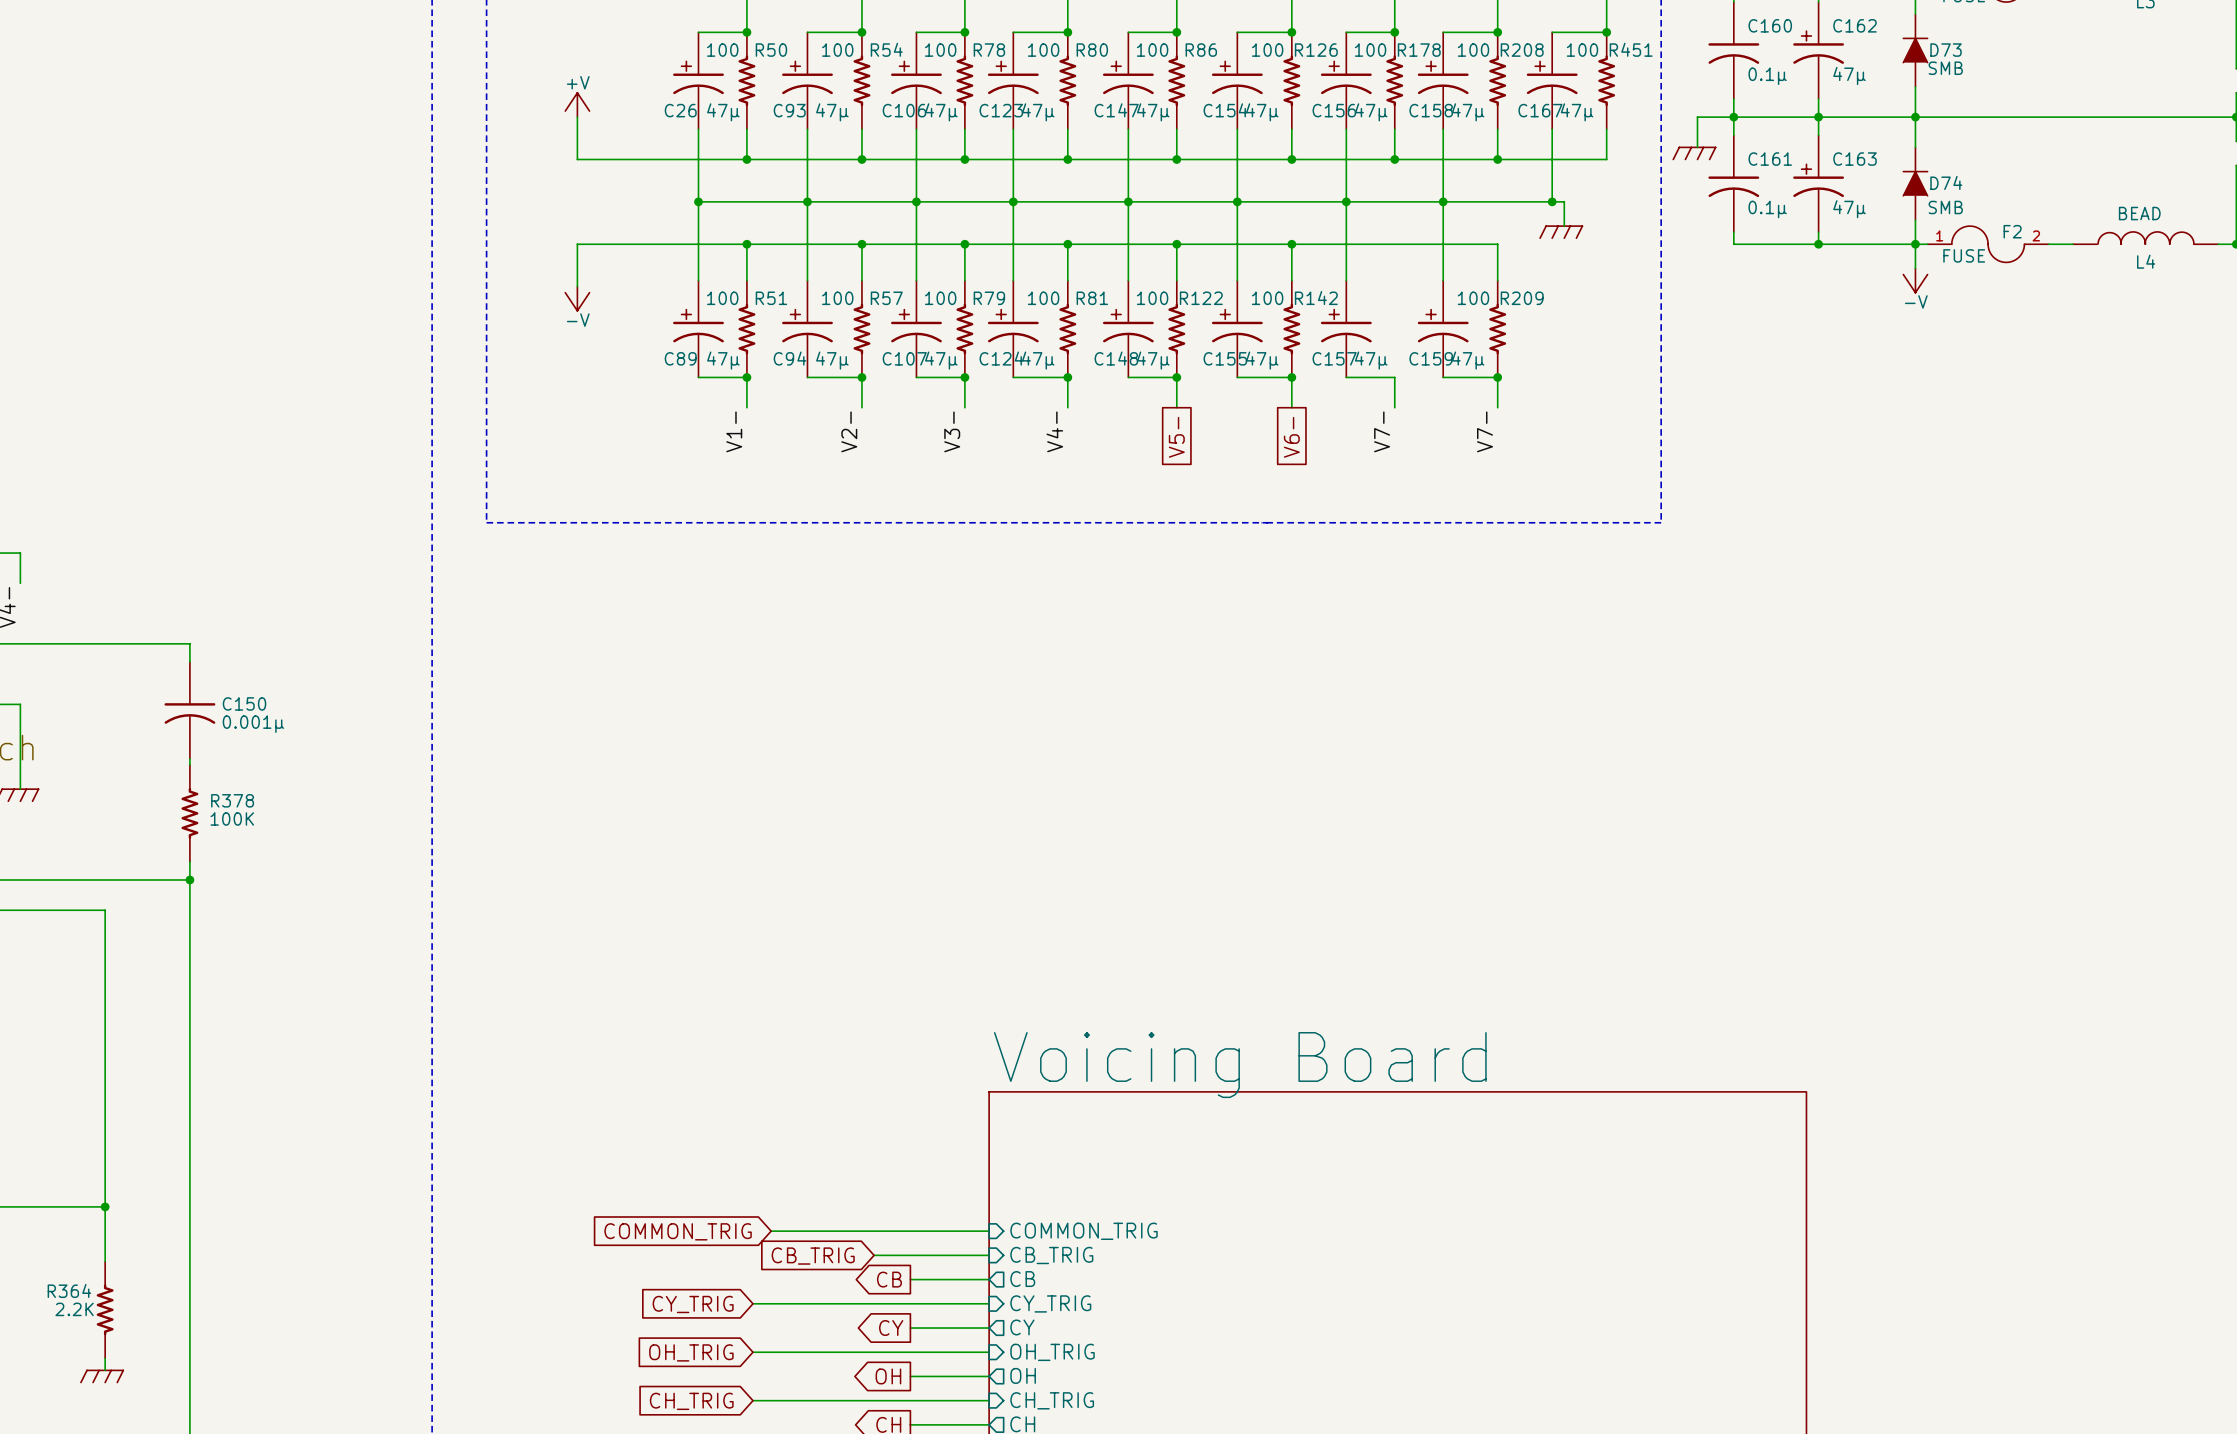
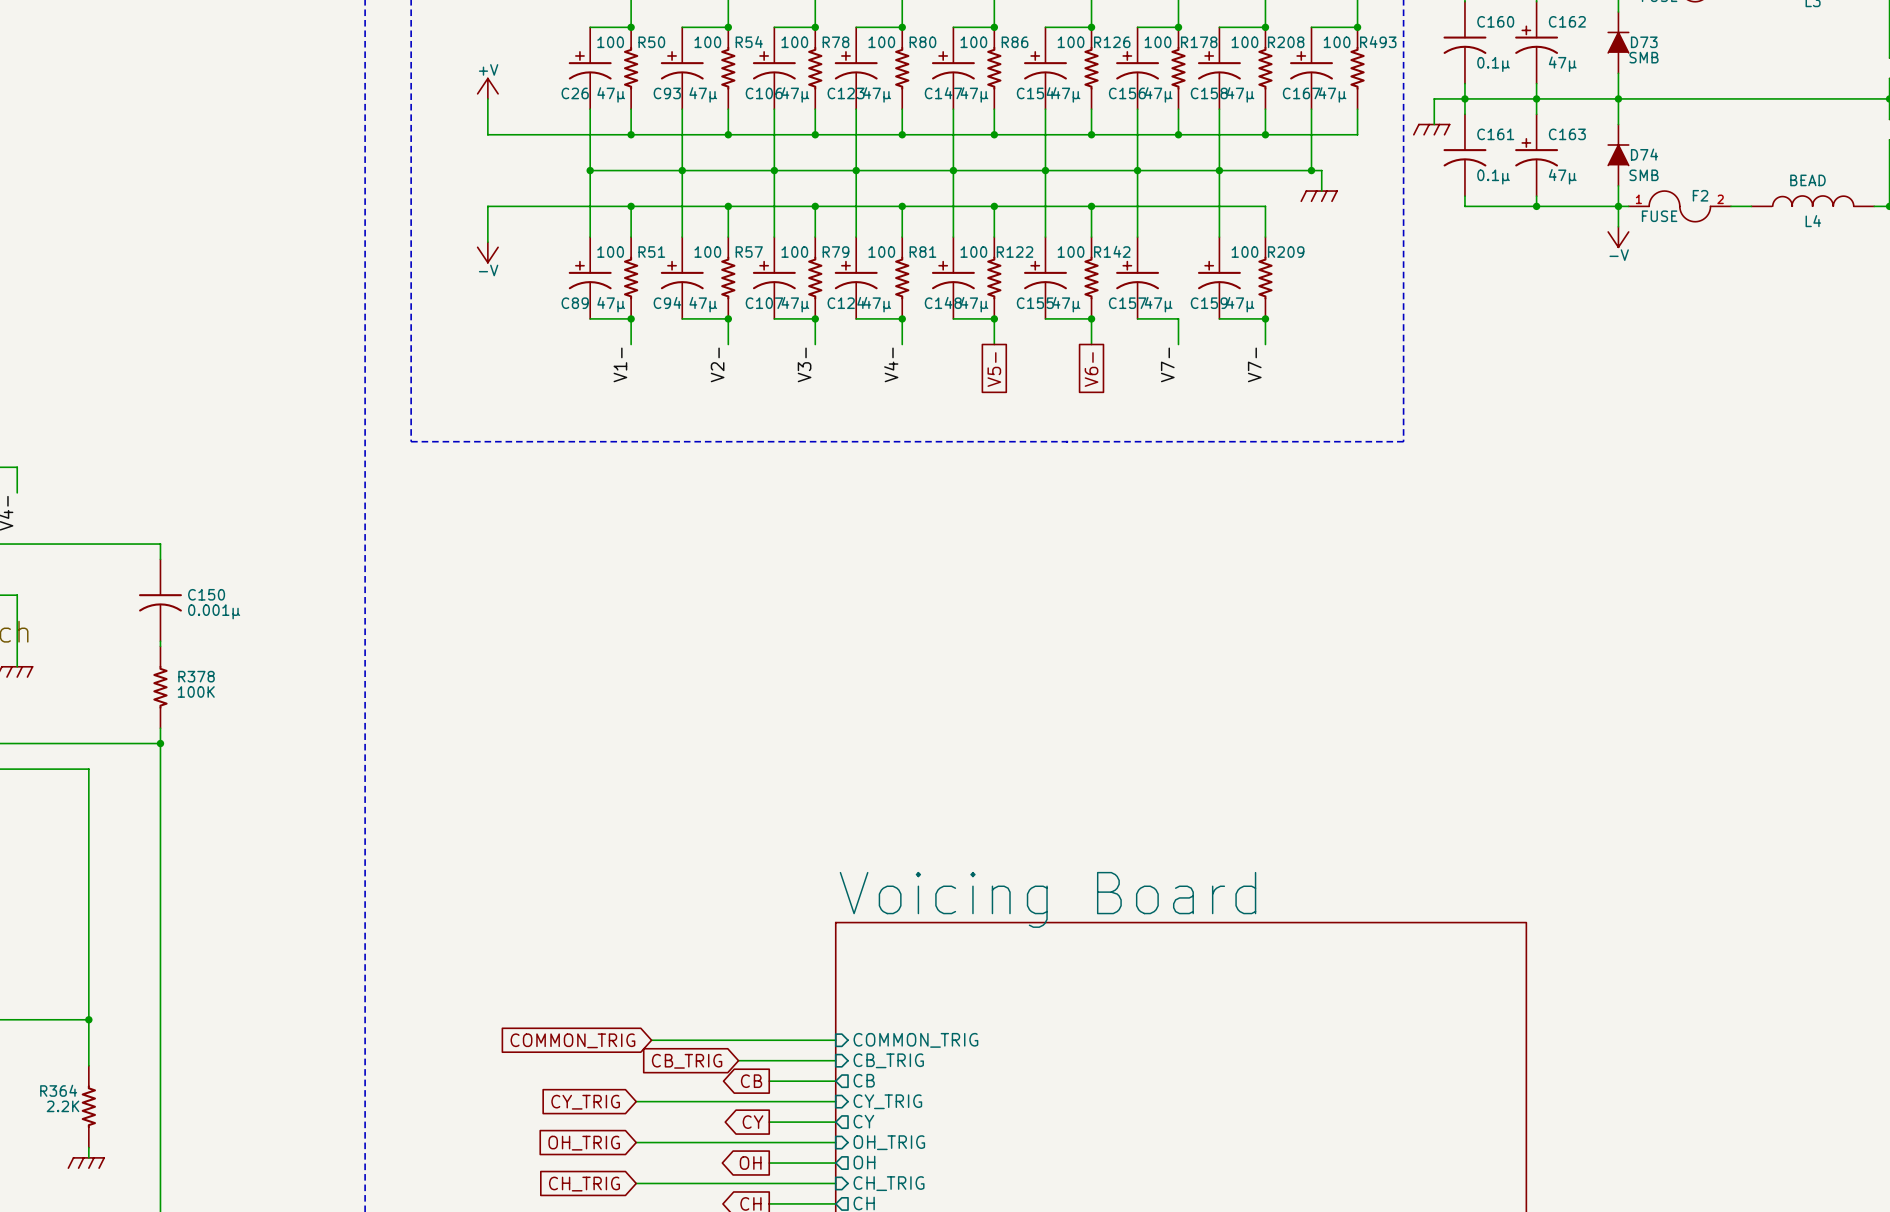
R451 name: R451 (1631, 49) -> R493 (1378, 42)

